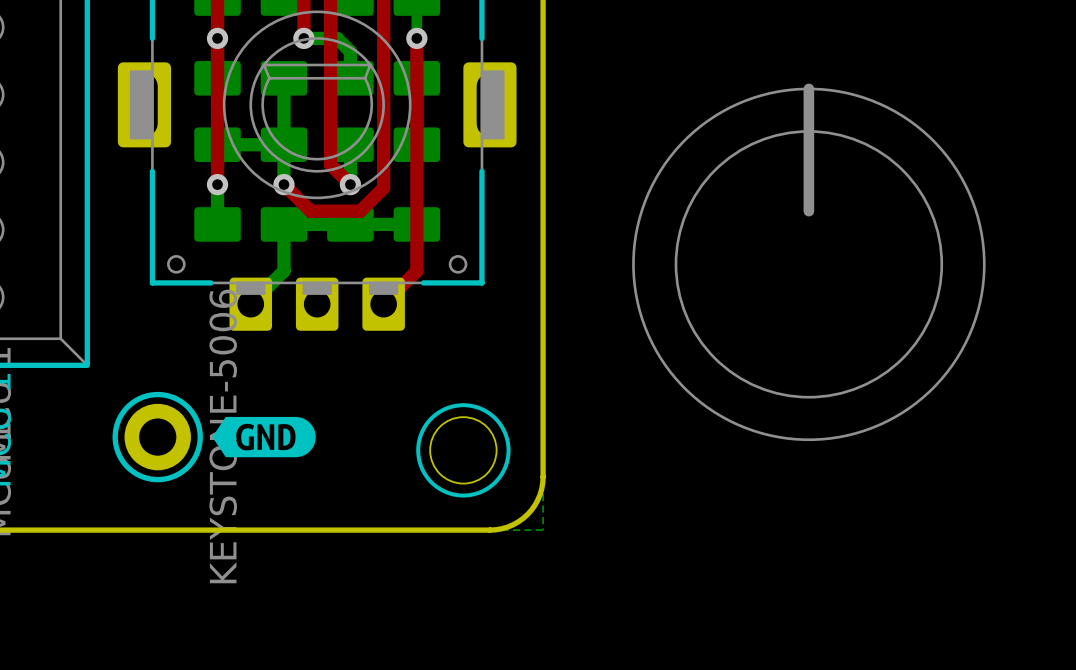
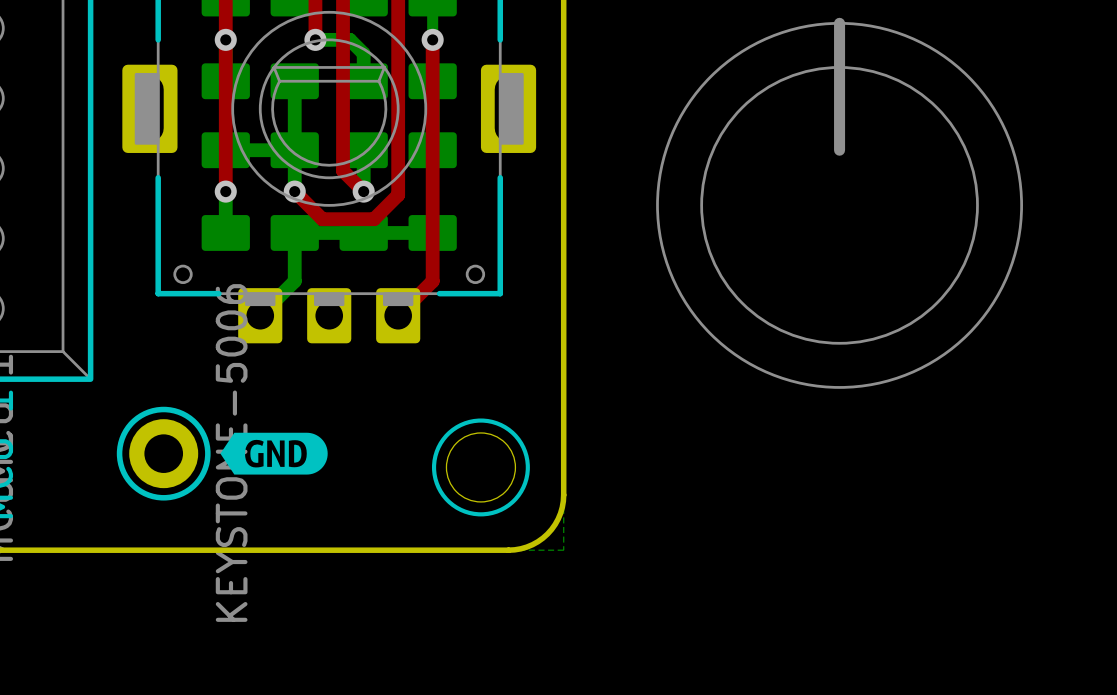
drawing position: (808, 262) -> (839, 203)

